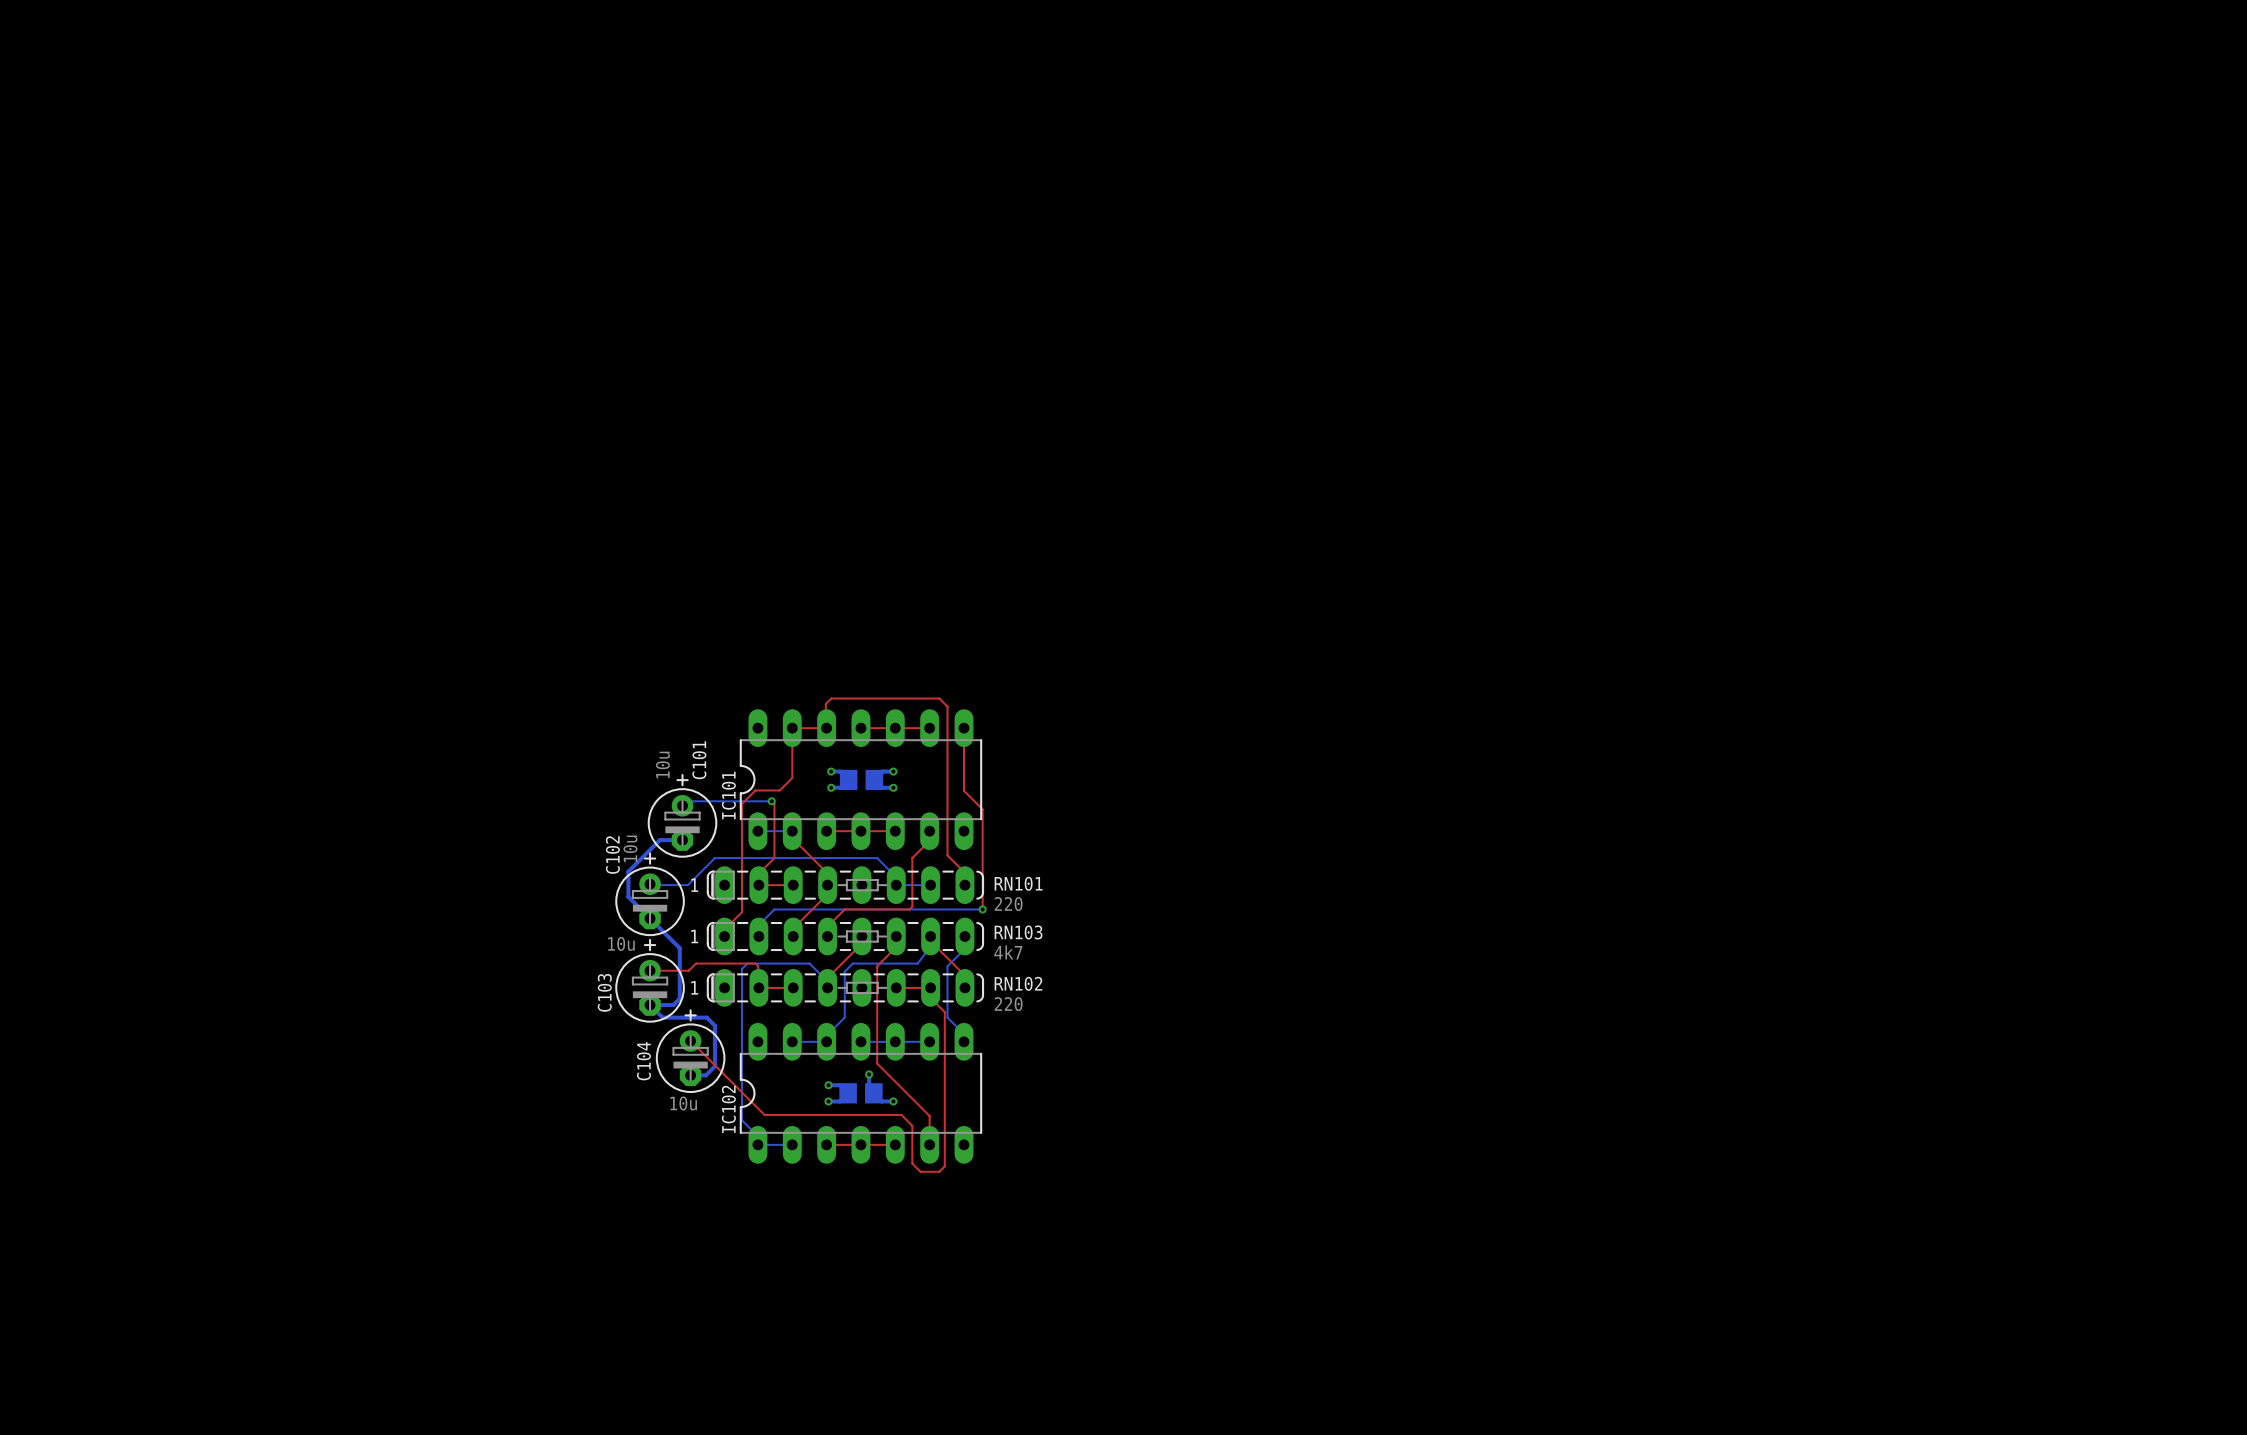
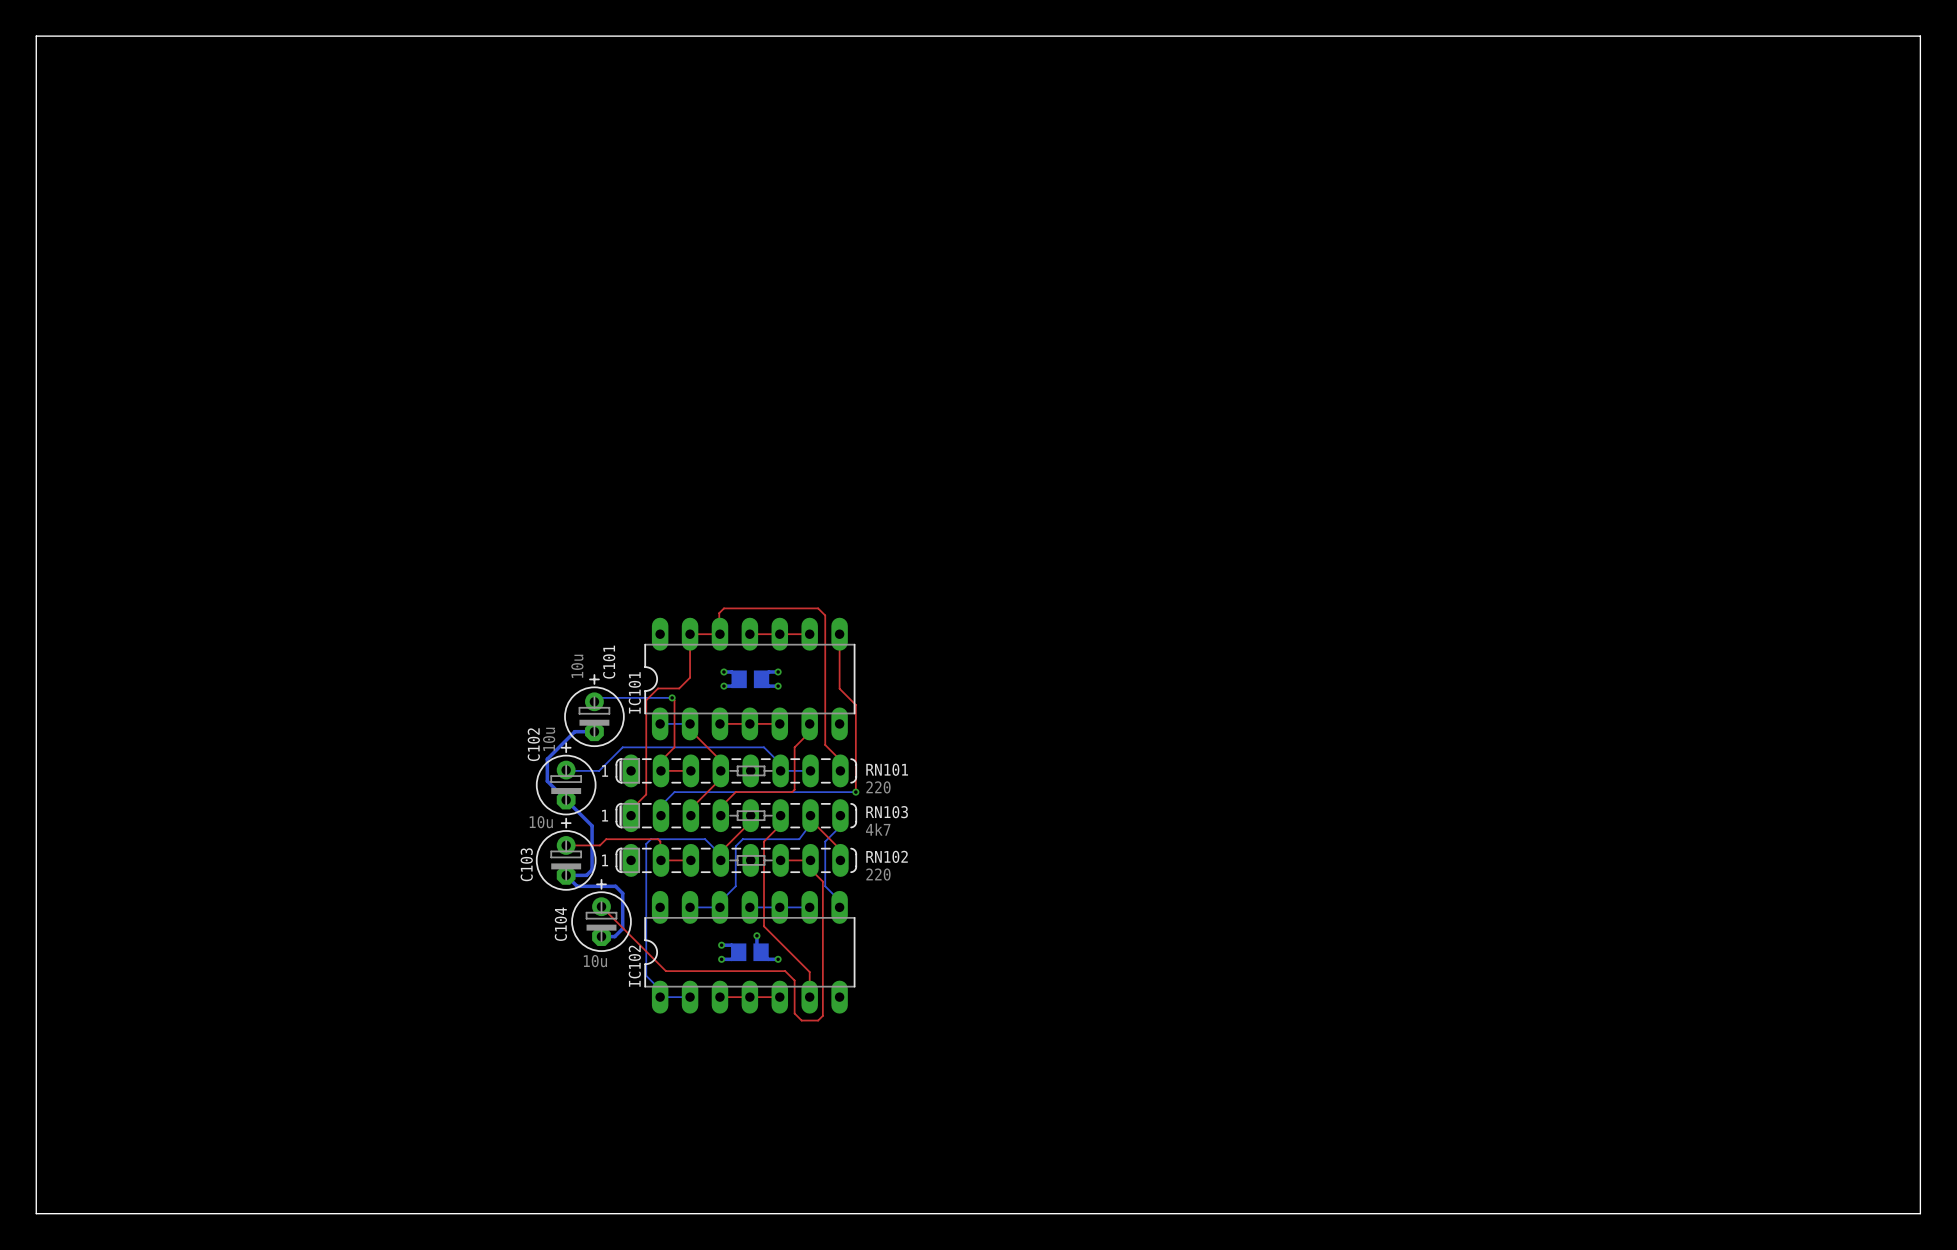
board edge: none -> (36, 36) (1920, 36) (1920, 1213) (36, 1213) (36, 36)

